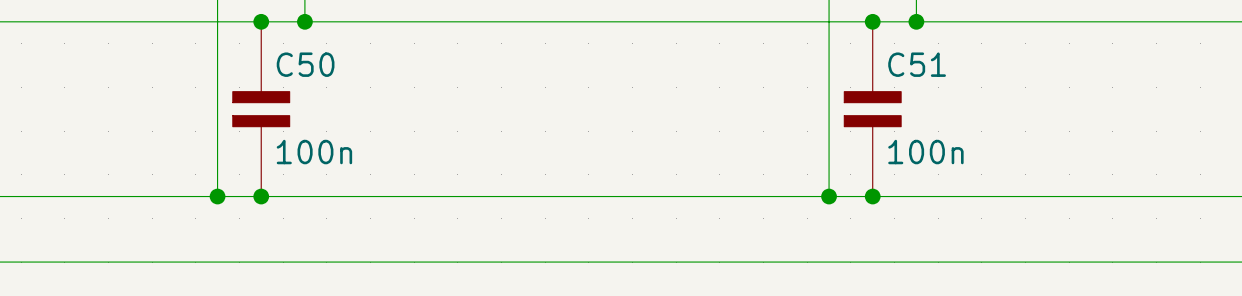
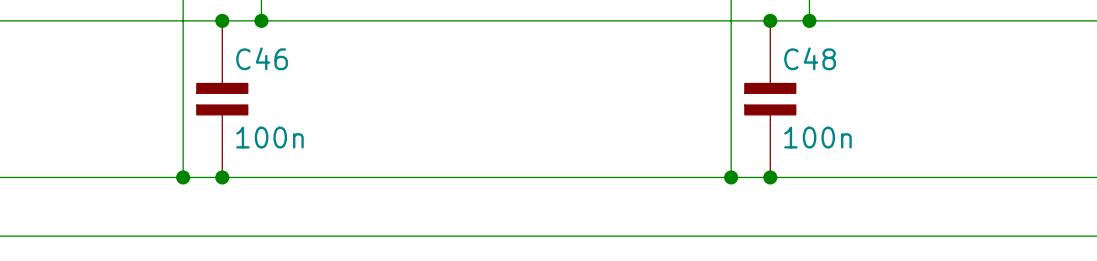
C50 name: C50 (305, 64) -> C46 (262, 58)
C51 name: C51 (917, 64) -> C48 (810, 58)

